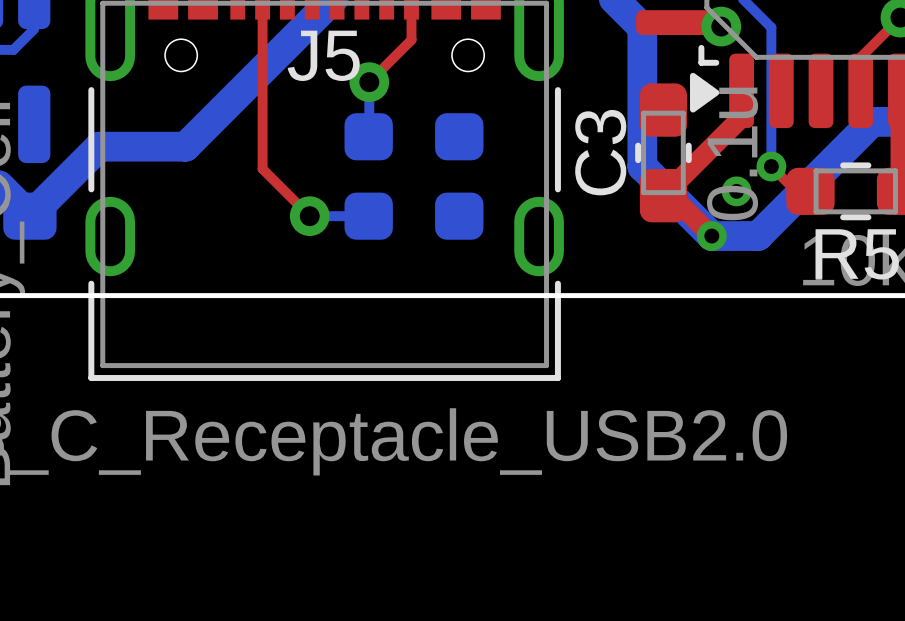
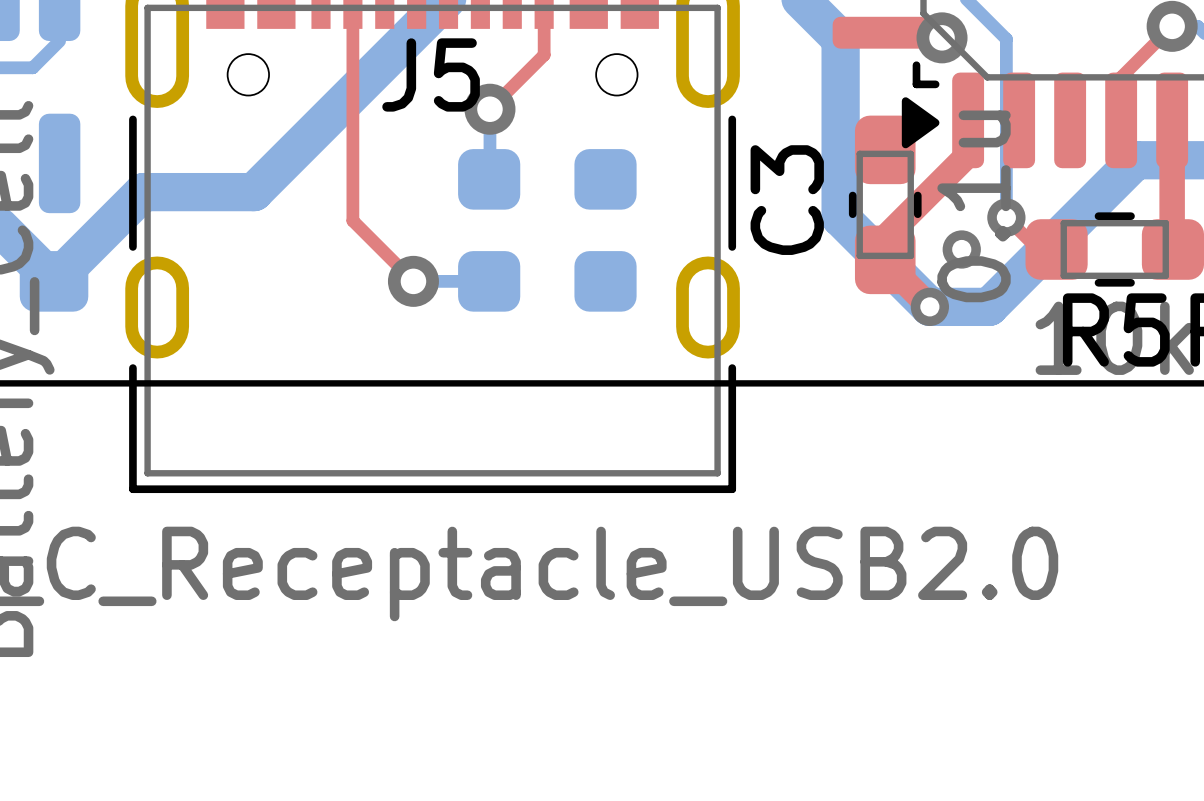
C3 position: (663, 152) -> (885, 204)

